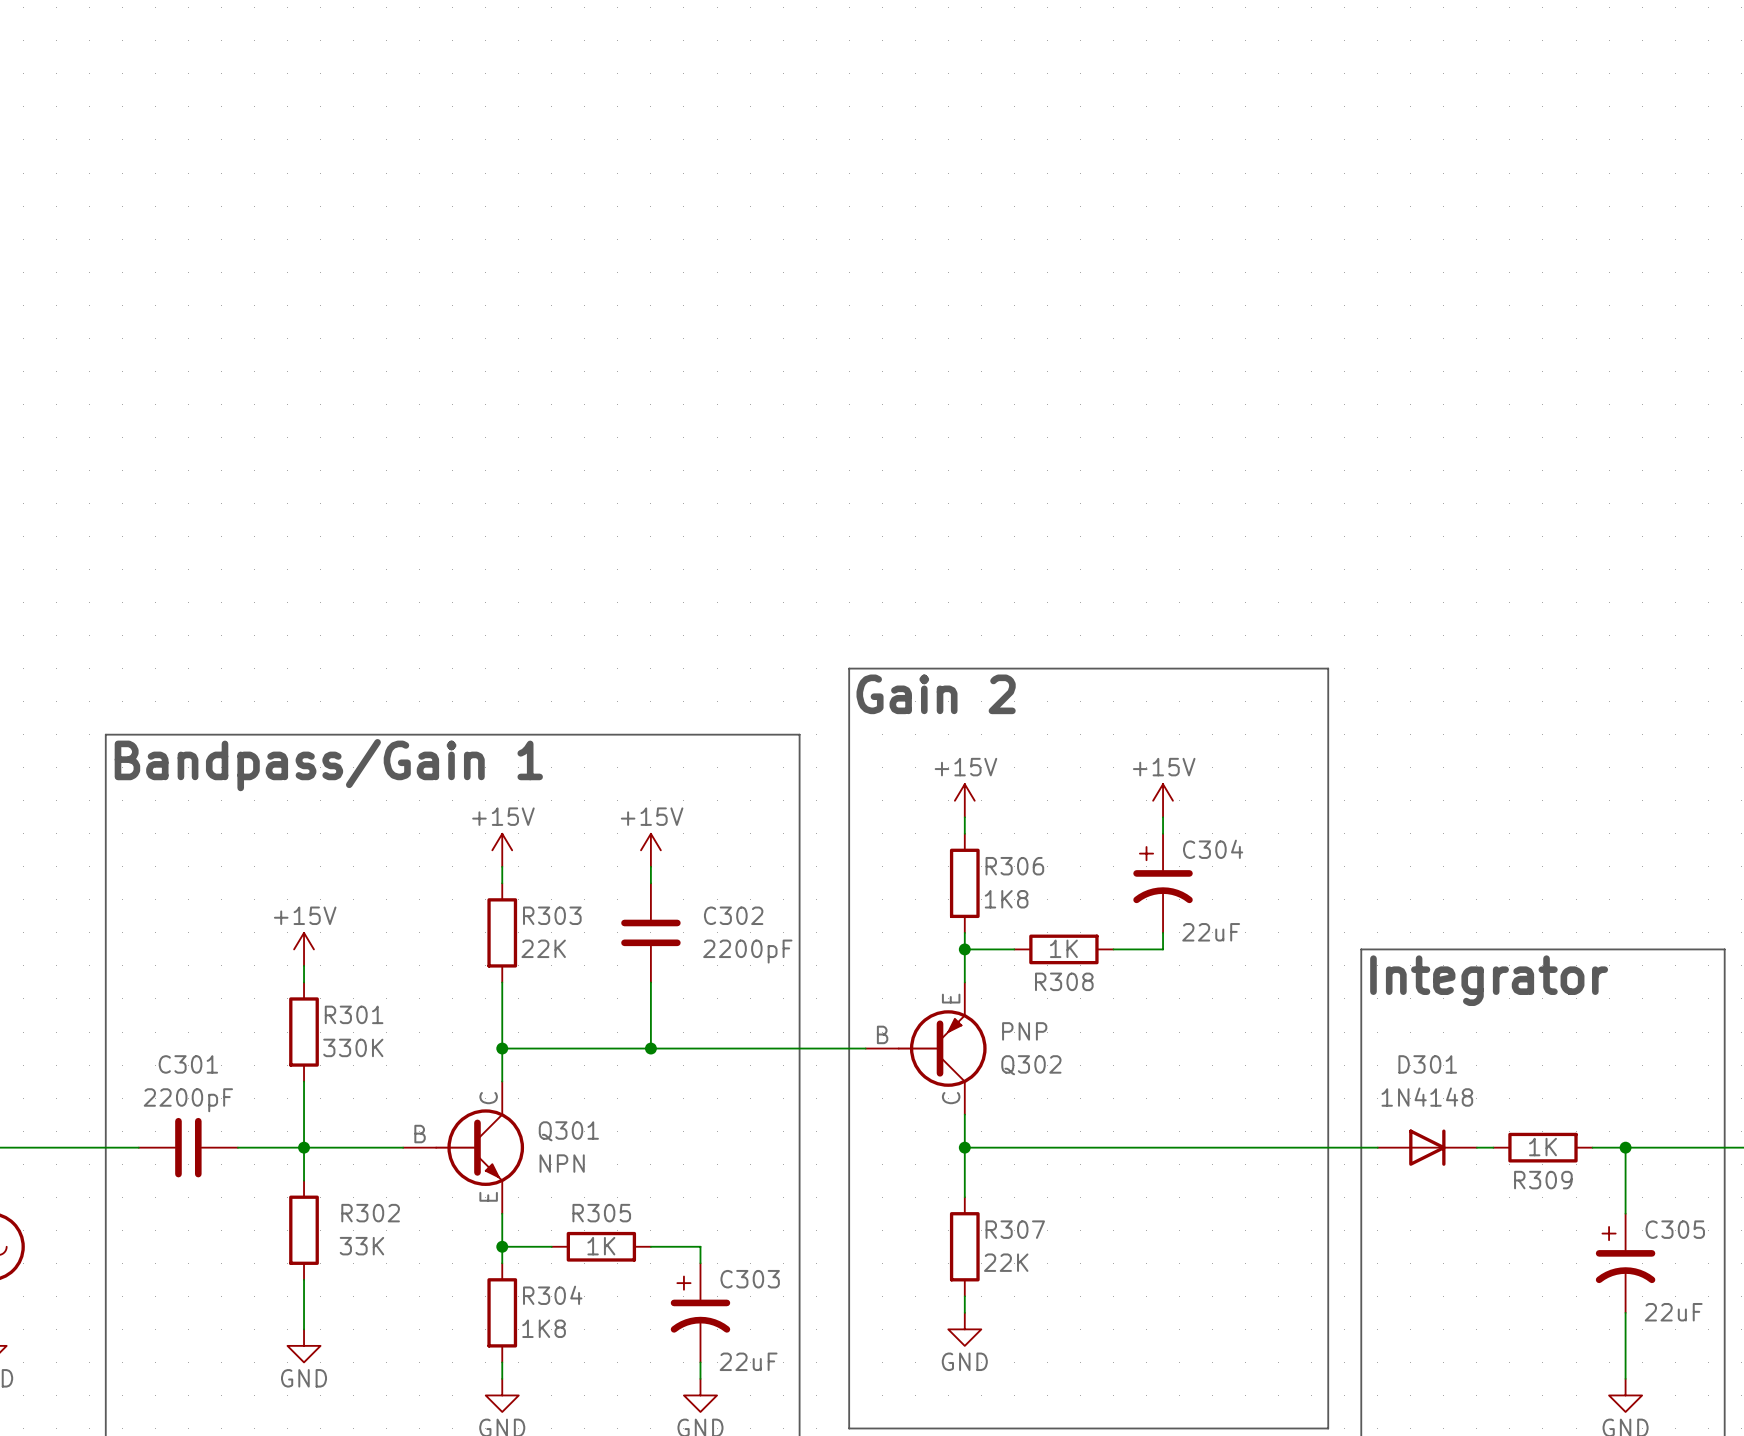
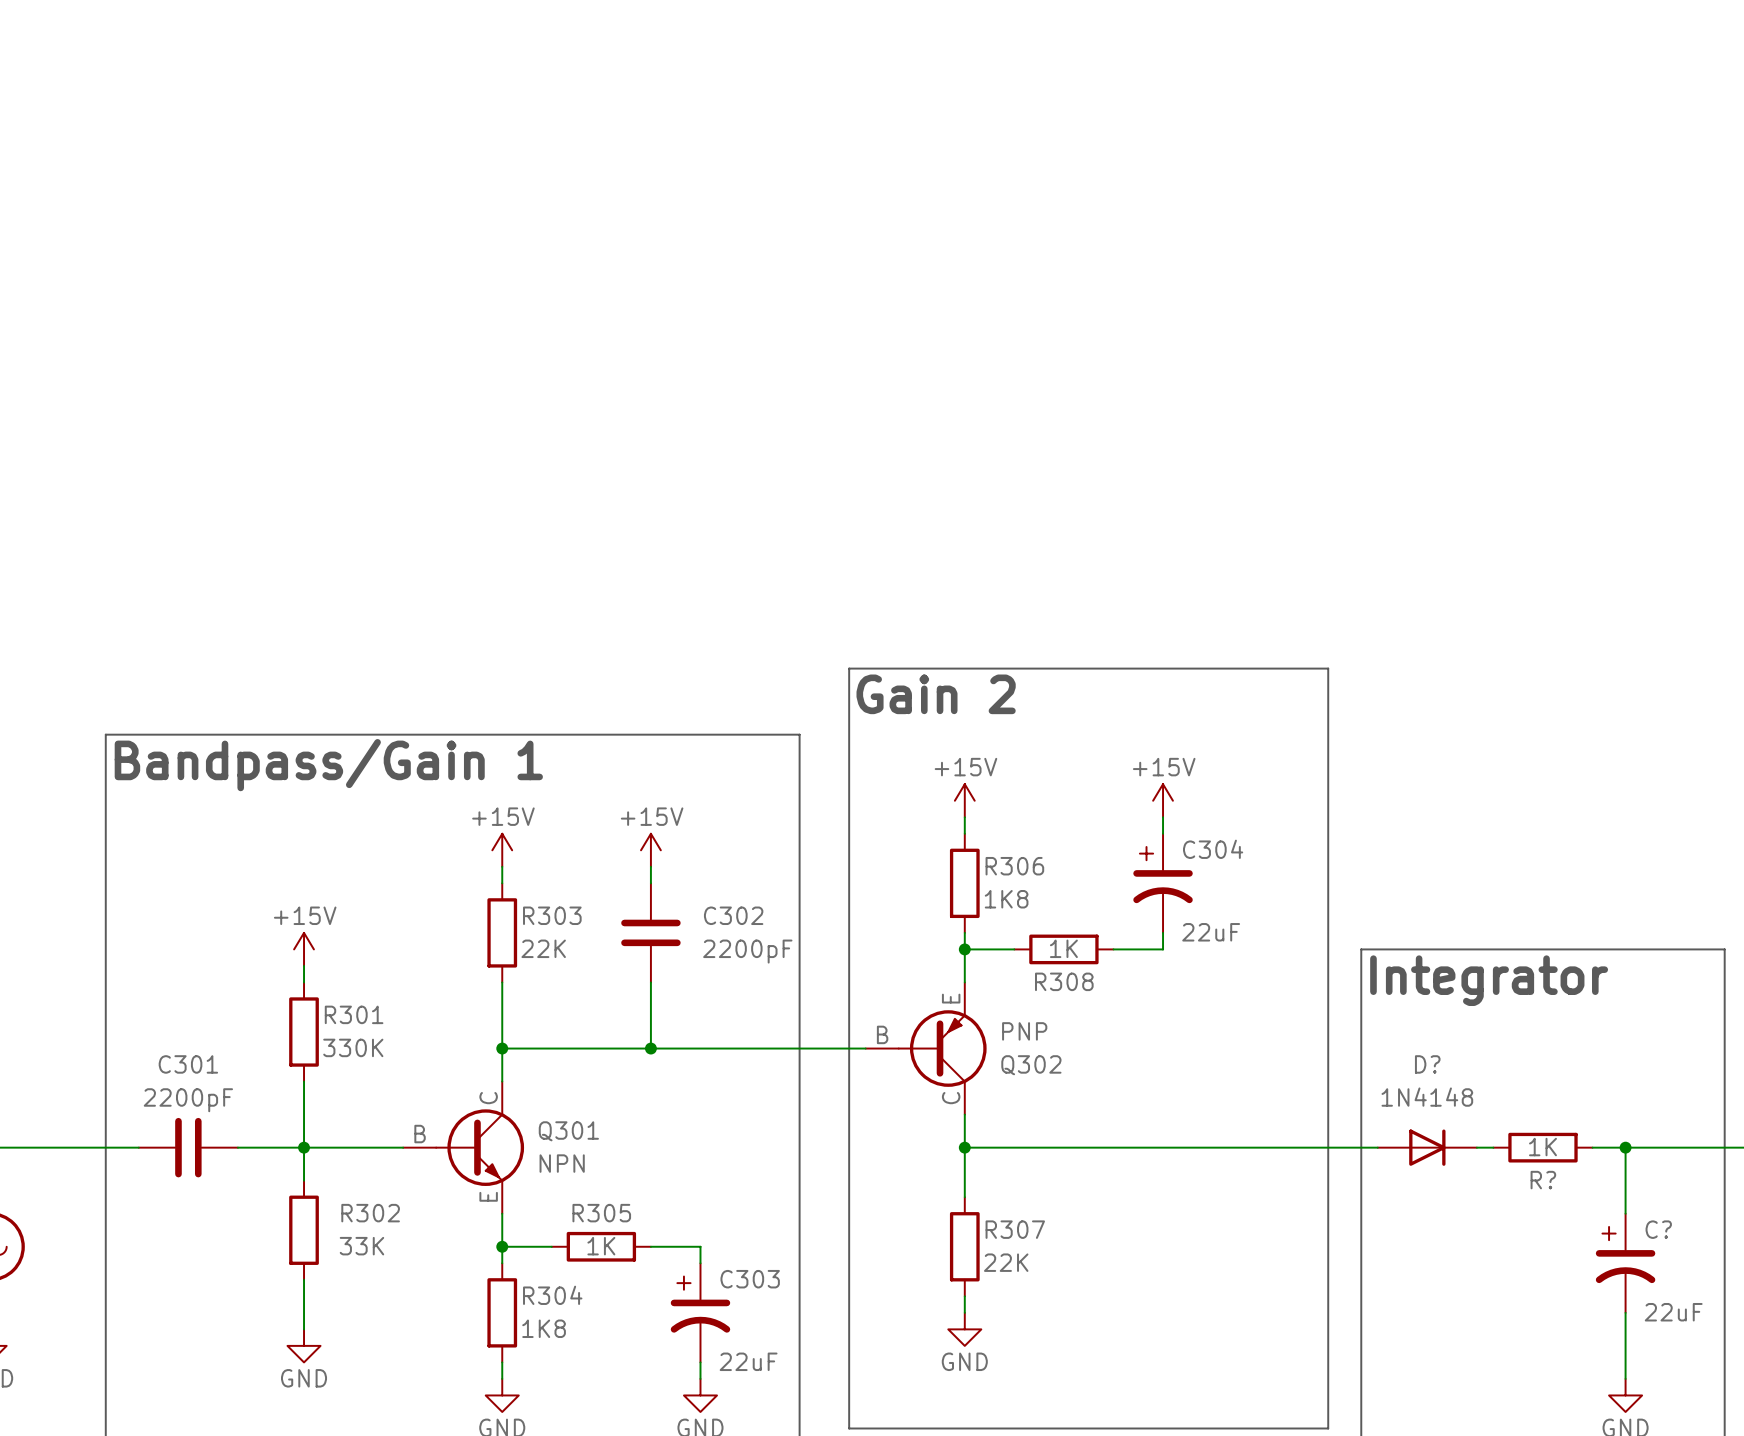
D301 name: D301 (1427, 1064) -> D? (1427, 1064)
R309 name: R309 (1543, 1180) -> R? (1543, 1180)
C305 name: C305 (1675, 1229) -> C? (1658, 1229)

